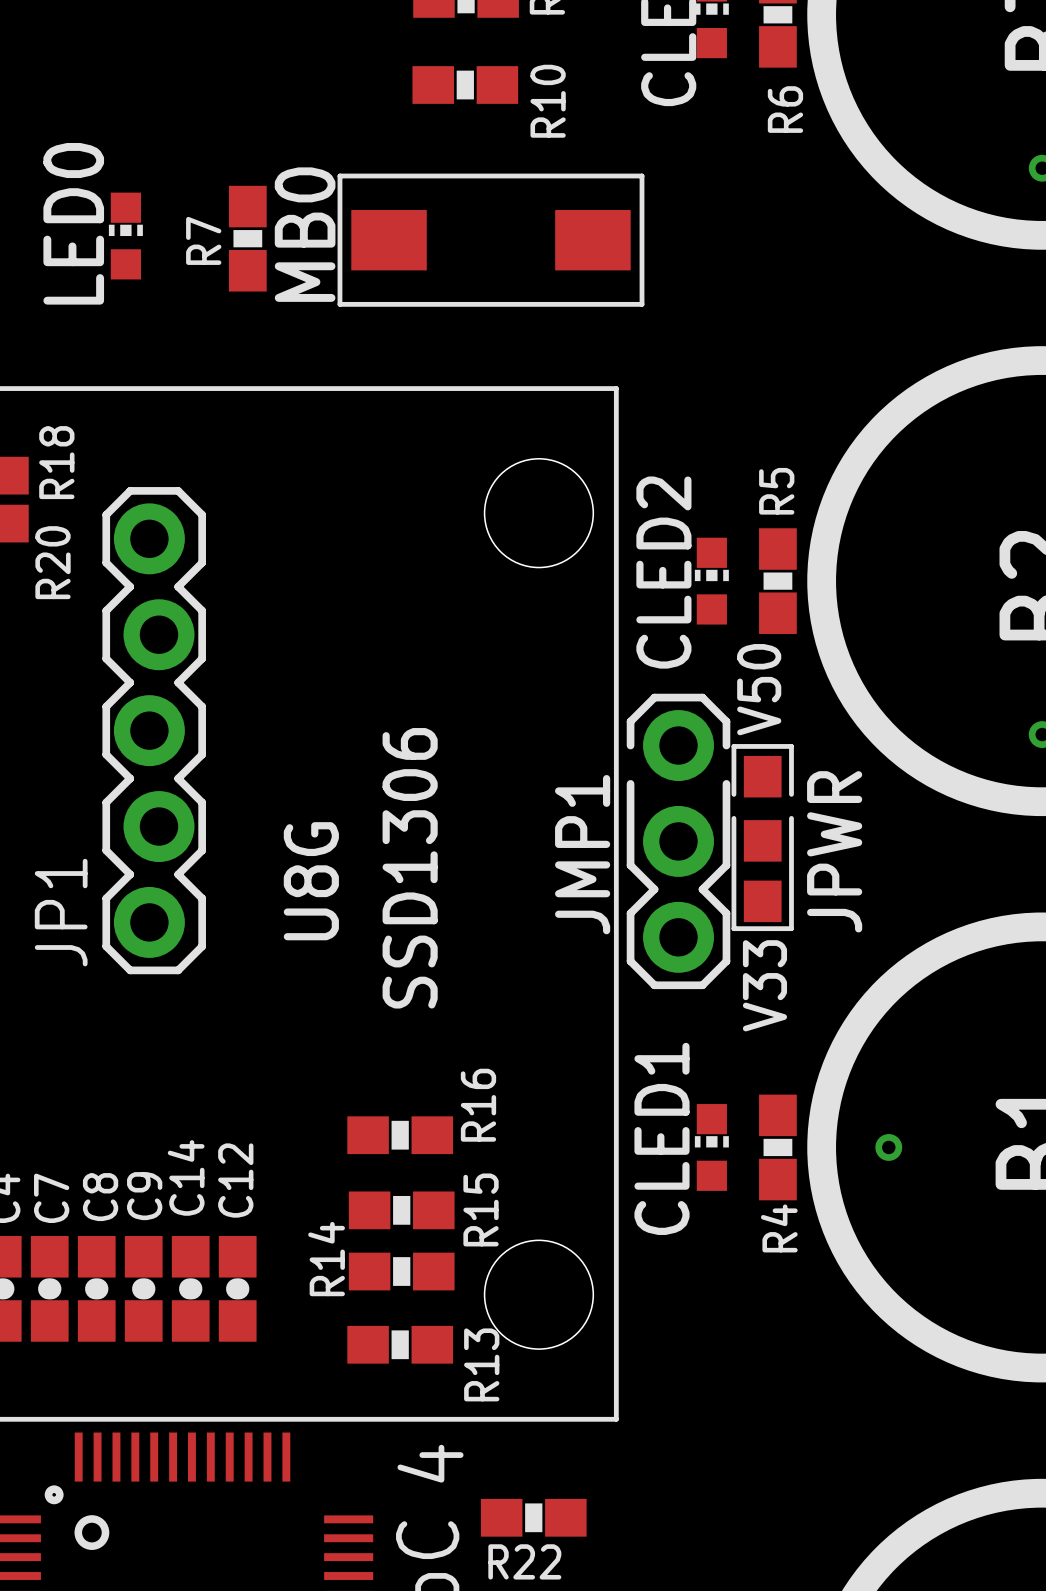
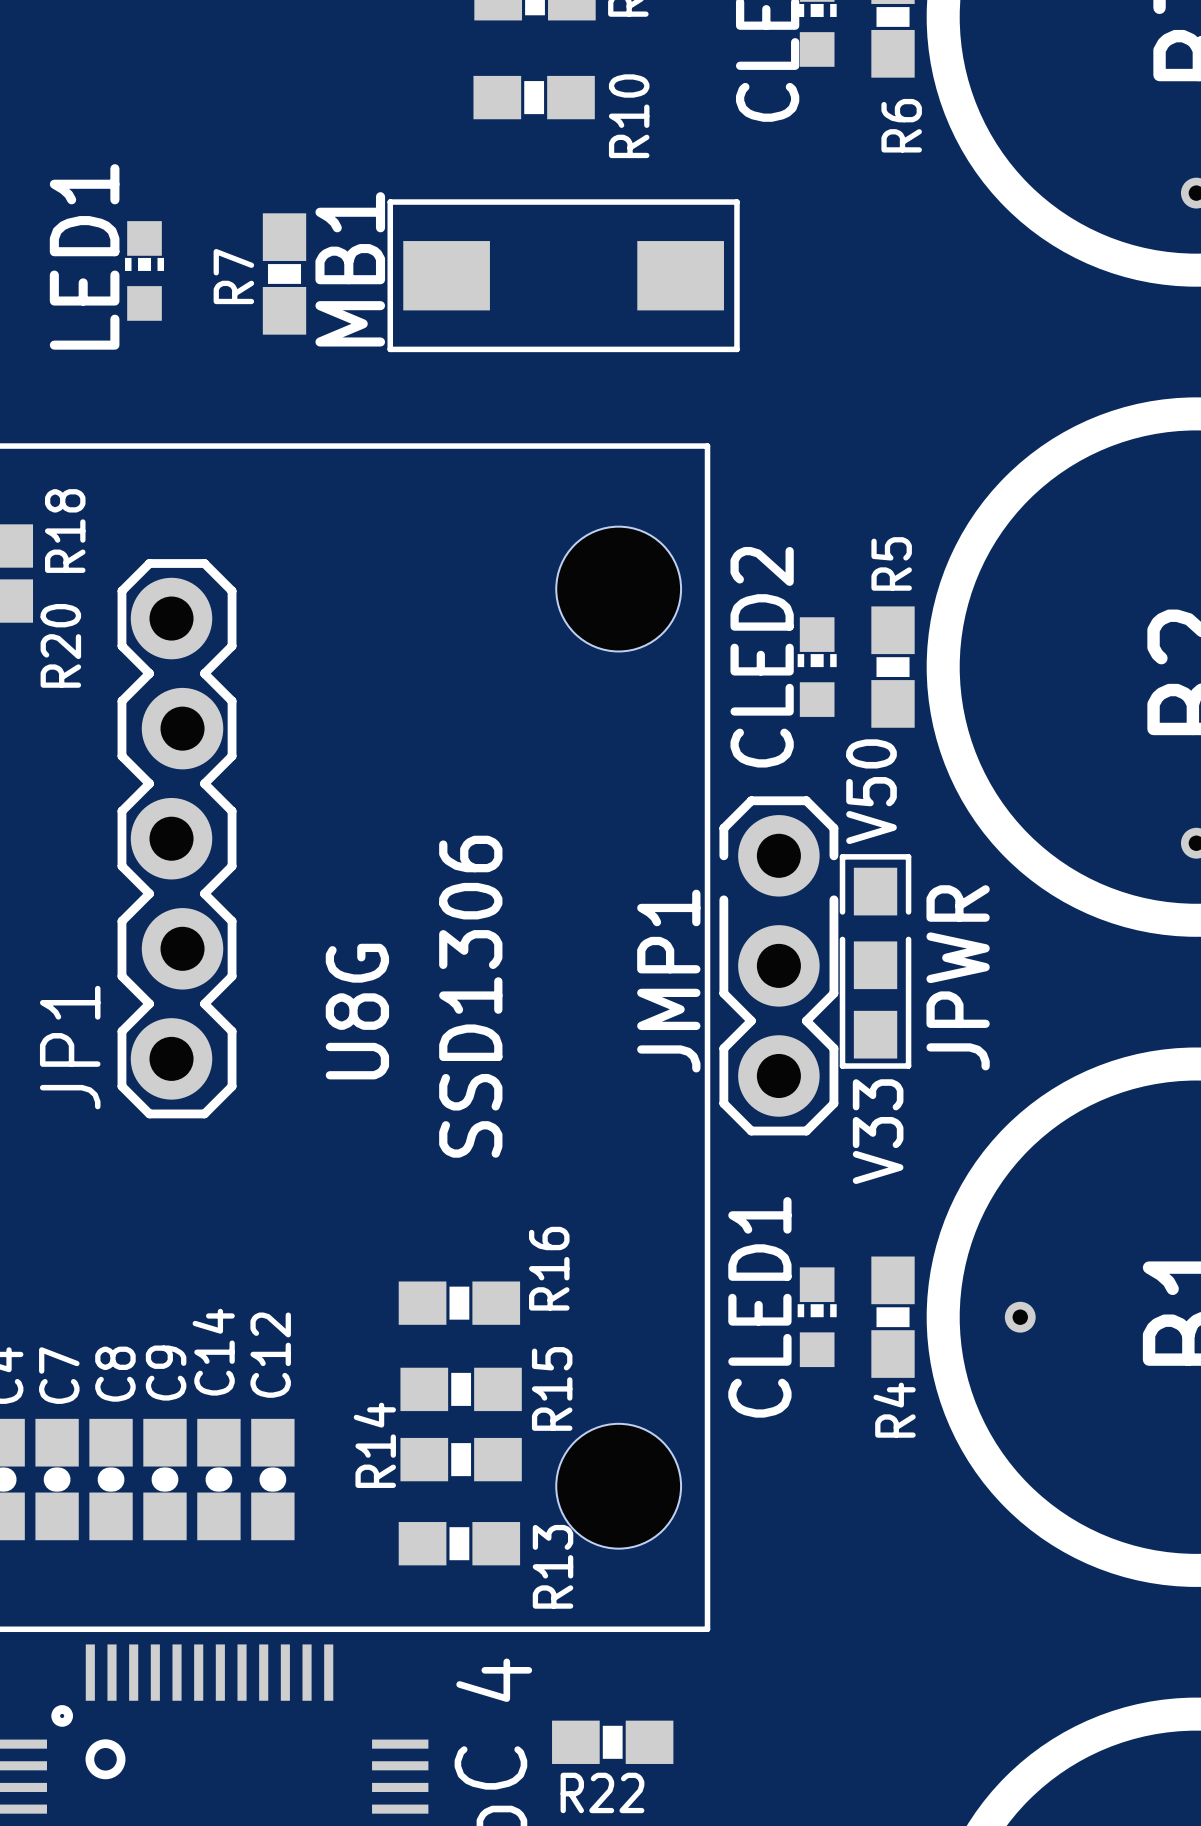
LED0 name: LED0 (73, 223) -> LED1 (84, 256)
text: MB0 (305, 234) -> MB1 (350, 269)

